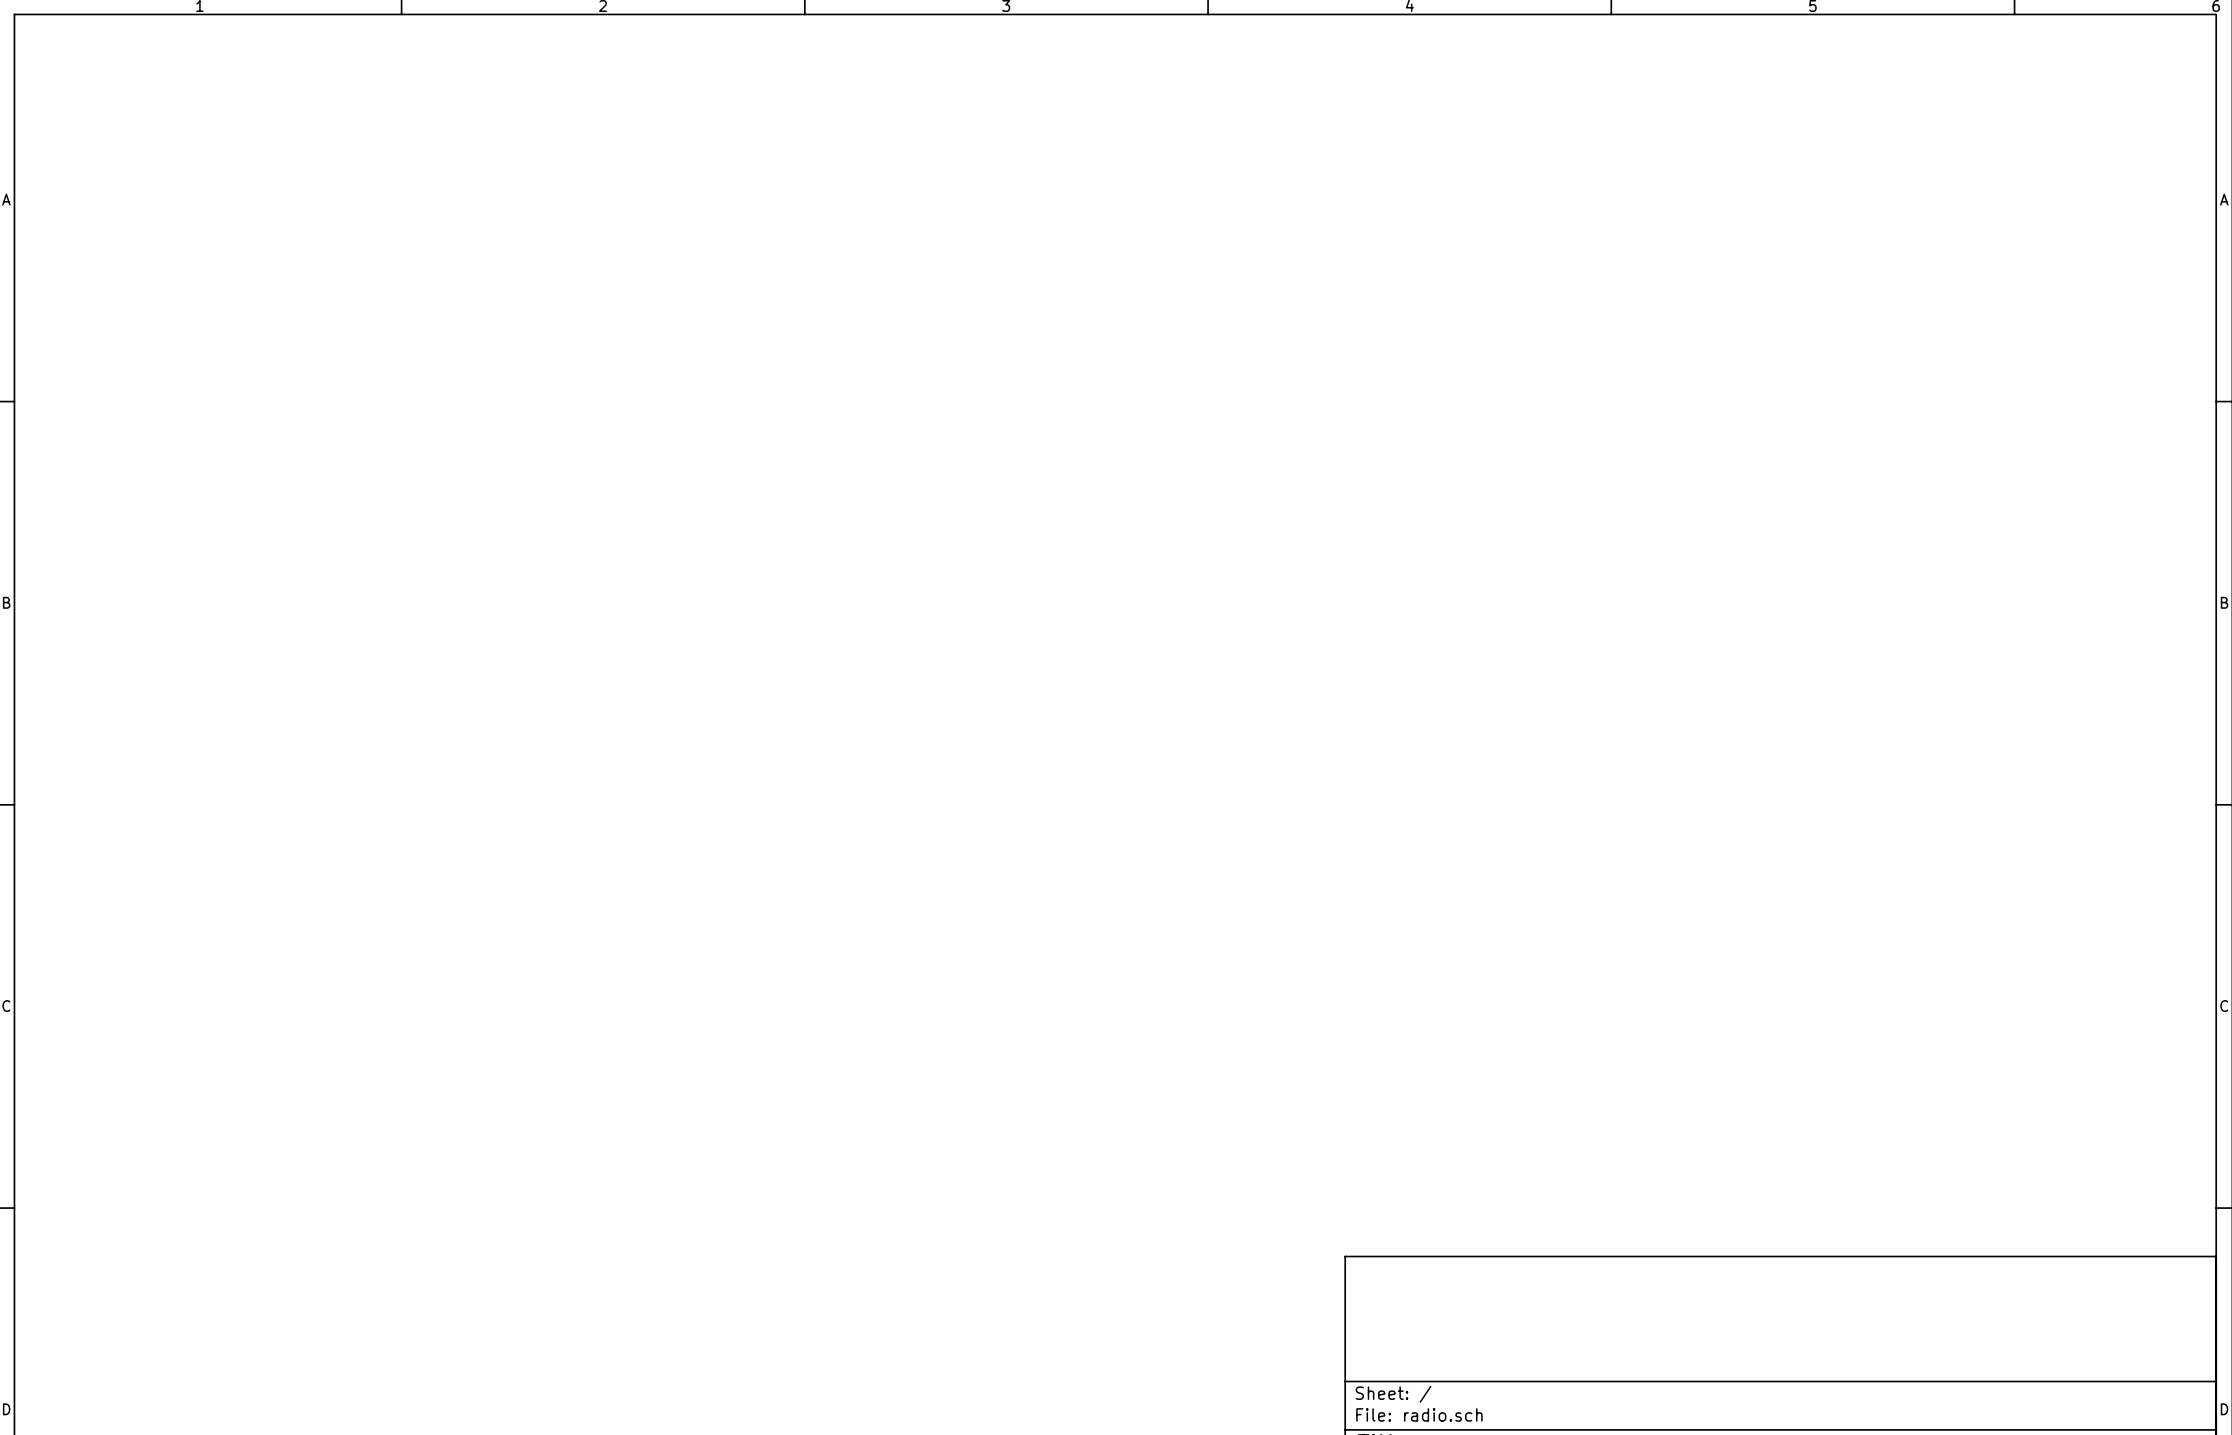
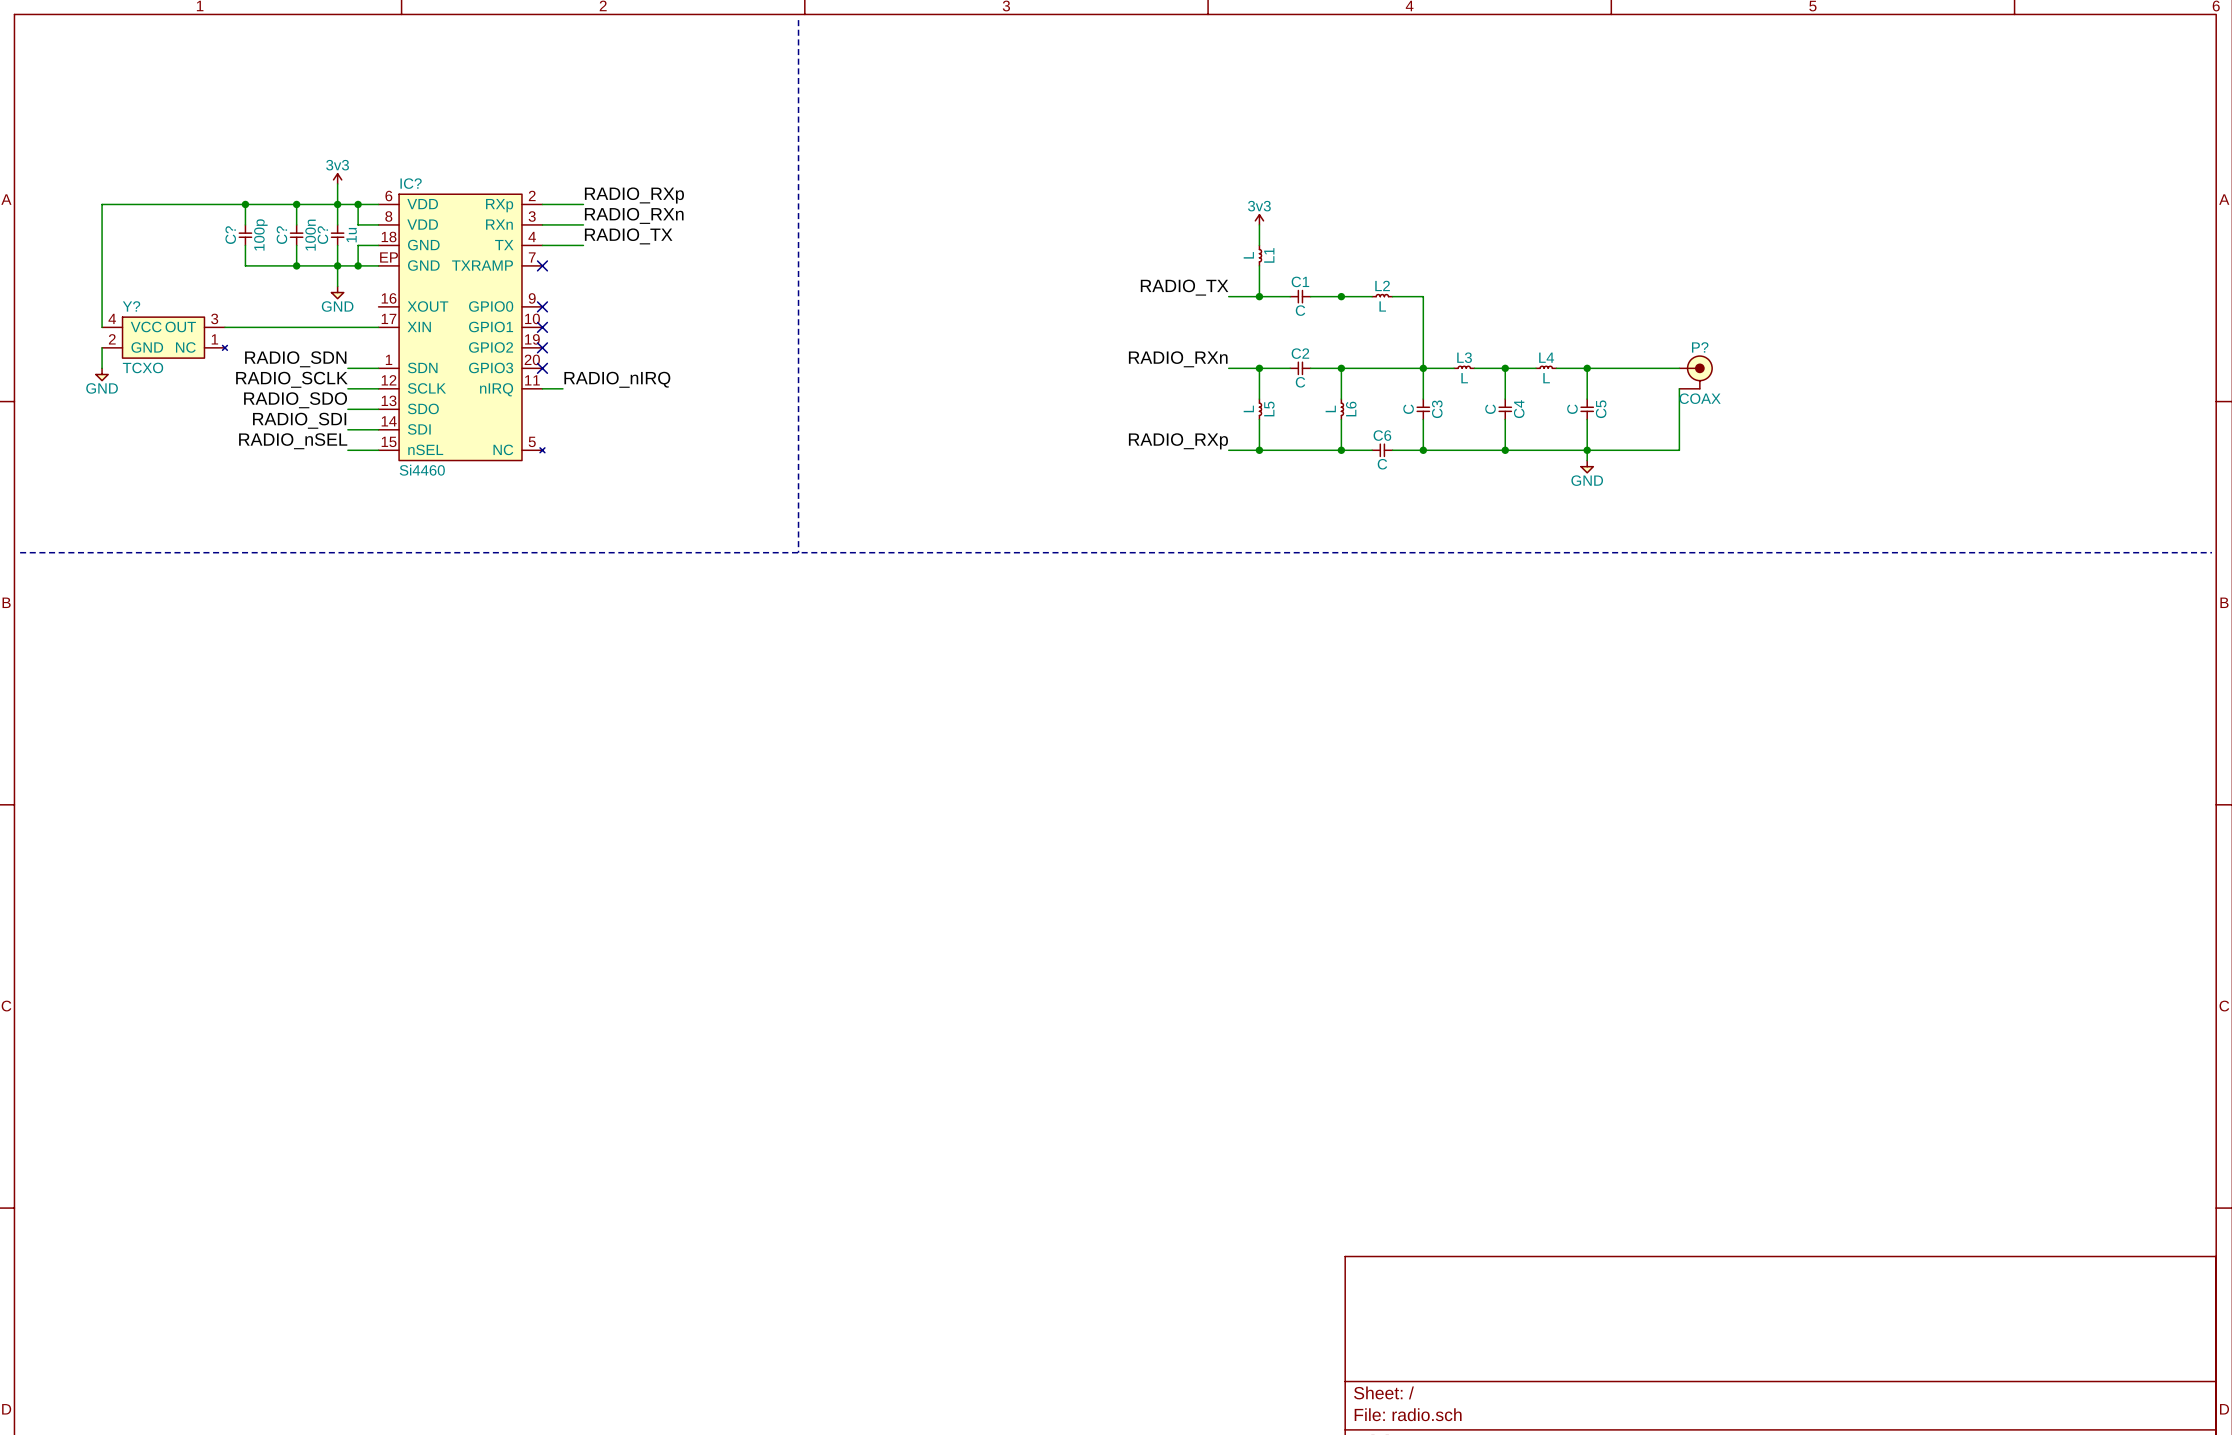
line: none -> (798, 20) (798, 552)
power symbol: none -> 3v3 (337, 178)
wire: none -> (337, 183) (337, 224)
label: none -> RADIO_RXp (634, 195)
wire: none -> (245, 204) (245, 224)
junction: none -> (245, 204)
wire: none -> (296, 204) (296, 224)
junction: none -> (296, 204)
junction: none -> (337, 204)
wire: none -> (358, 204) (358, 224) (378, 224)
junction: none -> (358, 204)
wire: none -> (378, 204) (102, 204) (102, 327)
wire: none -> (542, 204) (583, 204)
label: none -> RADIO_RXn (634, 215)
power symbol: none -> 3v3 (1259, 219)
wire: none -> (542, 224) (583, 224)
wire: none -> (1259, 224) (1259, 245)
C?: none -> 100p (245, 235)
C?: none -> 100n (296, 235)
C?: none -> 1u (337, 235)
label: none -> RADIO_TX (628, 236)
wire: none -> (245, 245) (245, 265) (378, 265)
wire: none -> (296, 245) (296, 265)
wire: none -> (337, 245) (337, 286)
wire: none -> (378, 245) (358, 245) (358, 265)
wire: none -> (542, 245) (583, 245)
L1: none -> L (1260, 255)
junction: none -> (296, 265)
junction: none -> (337, 265)
junction: none -> (358, 265)
no-connect mark: none -> (542, 265)
wire: none -> (1259, 265) (1259, 296)
label: none -> RADIO_TX (1184, 287)
power symbol: none -> GND (337, 292)
L2: none -> L (1382, 295)
wire: none -> (1228, 296) (1290, 296)
junction: none -> (1259, 296)
C1: none -> C (1300, 296)
wire: none -> (1310, 296) (1372, 296)
junction: none -> (1341, 296)
wire: none -> (1392, 296) (1423, 296) (1423, 399)
no-connect mark: none -> (542, 306)
wire: none -> (224, 327) (378, 327)
IC?: none -> Si4460 (461, 327)
no-connect mark: none -> (542, 327)
Y?: none -> TCXO (164, 337)
wire: none -> (102, 347) (102, 368)
no-connect mark: none -> (542, 347)
label: none -> RADIO_SDN (295, 359)
label: none -> RADIO_RXn (1178, 359)
L3: none -> L (1464, 367)
L4: none -> L (1546, 367)
wire: none -> (347, 368) (378, 368)
no-connect mark: none -> (542, 368)
wire: none -> (1228, 368) (1290, 368)
wire: none -> (1259, 368) (1259, 399)
junction: none -> (1259, 368)
C2: none -> C (1300, 368)
wire: none -> (1310, 368) (1454, 368)
wire: none -> (1341, 368) (1341, 399)
junction: none -> (1341, 368)
junction: none -> (1423, 368)
wire: none -> (1474, 368) (1535, 368)
wire: none -> (1505, 368) (1505, 399)
junction: none -> (1505, 368)
wire: none -> (1556, 368) (1679, 368)
wire: none -> (1587, 368) (1587, 399)
junction: none -> (1587, 368)
P?: none -> COAX (1695, 372)
power symbol: none -> GND (102, 374)
label: none -> RADIO_SCLK (291, 379)
label: none -> RADIO_nIRQ (617, 379)
wire: none -> (347, 388) (378, 388)
wire: none -> (542, 388) (562, 388)
wire: none -> (1679, 388) (1679, 450) (1392, 450)
label: none -> RADIO_SDO (295, 400)
wire: none -> (347, 409) (378, 409)
L5: none -> L (1260, 409)
L6: none -> L (1342, 409)
C3: none -> C (1423, 409)
C4: none -> C (1505, 409)
C5: none -> C (1587, 409)
label: none -> RADIO_SDI (299, 420)
wire: none -> (1259, 419) (1259, 450)
wire: none -> (1341, 419) (1341, 450)
wire: none -> (1423, 419) (1423, 450)
wire: none -> (1505, 419) (1505, 450)
wire: none -> (1587, 419) (1587, 460)
wire: none -> (347, 429) (378, 429)
label: none -> RADIO_nSEL (293, 441)
label: none -> RADIO_RXp (1178, 441)
wire: none -> (347, 450) (378, 450)
wire: none -> (1228, 450) (1372, 450)
junction: none -> (1259, 450)
junction: none -> (1341, 450)
C6: none -> C (1382, 450)
junction: none -> (1423, 450)
junction: none -> (1505, 450)
junction: none -> (1587, 450)
power symbol: none -> GND (1587, 466)
line: none -> (20, 552) (2211, 552)

